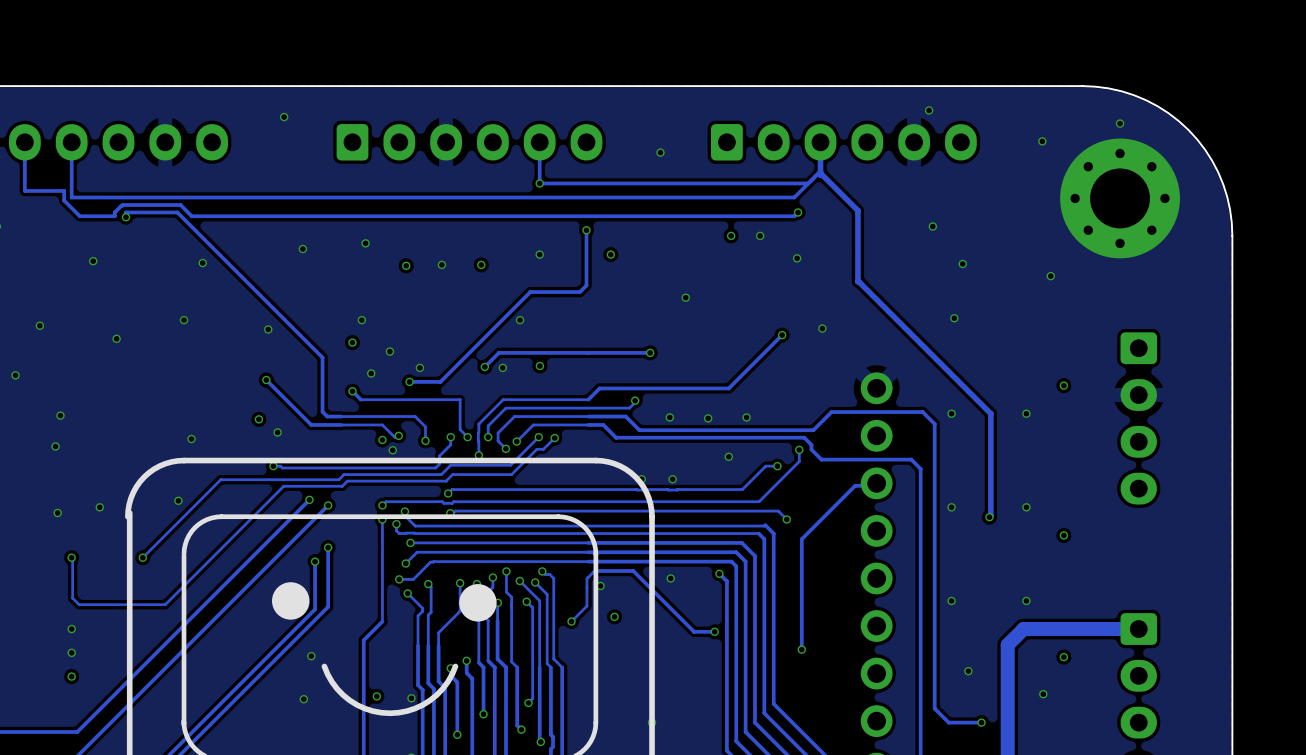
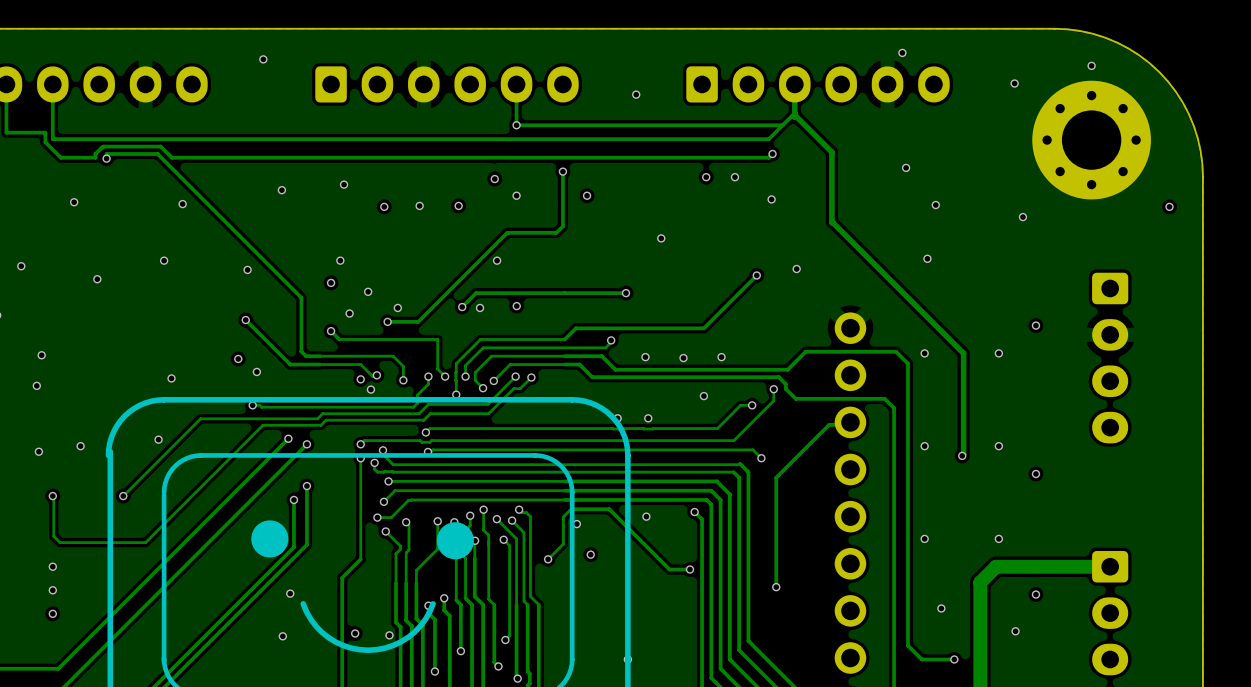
via: none -> (494, 179)
via: none -> (1169, 206)

